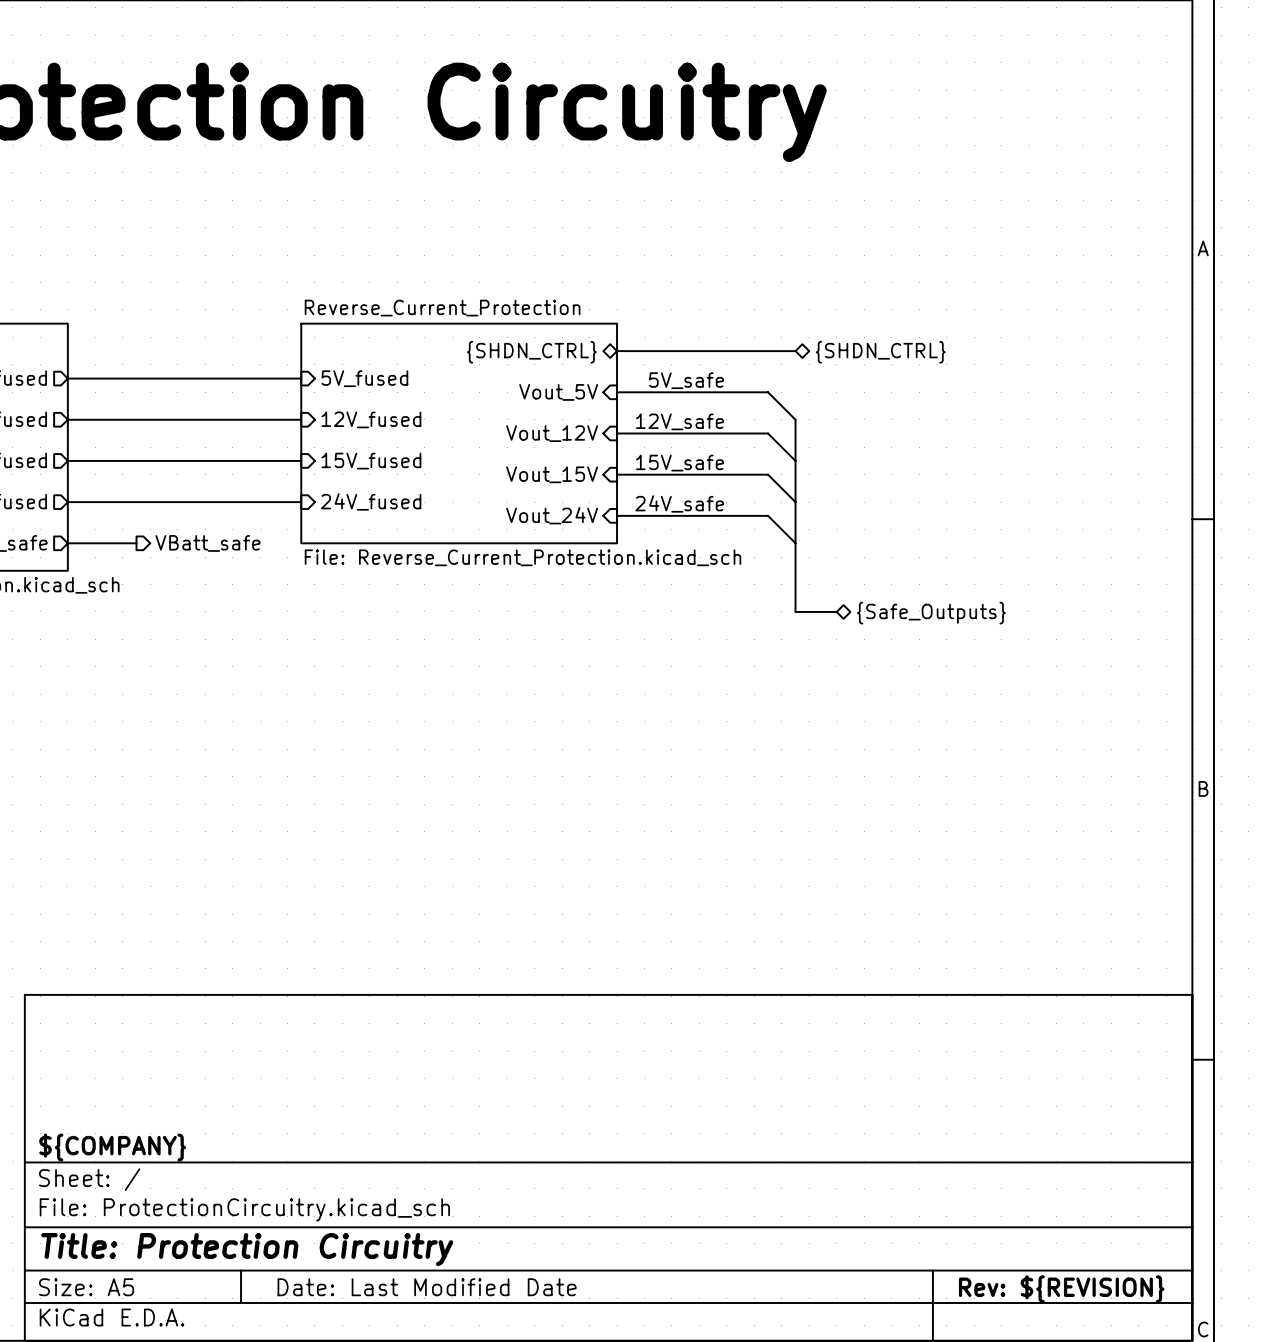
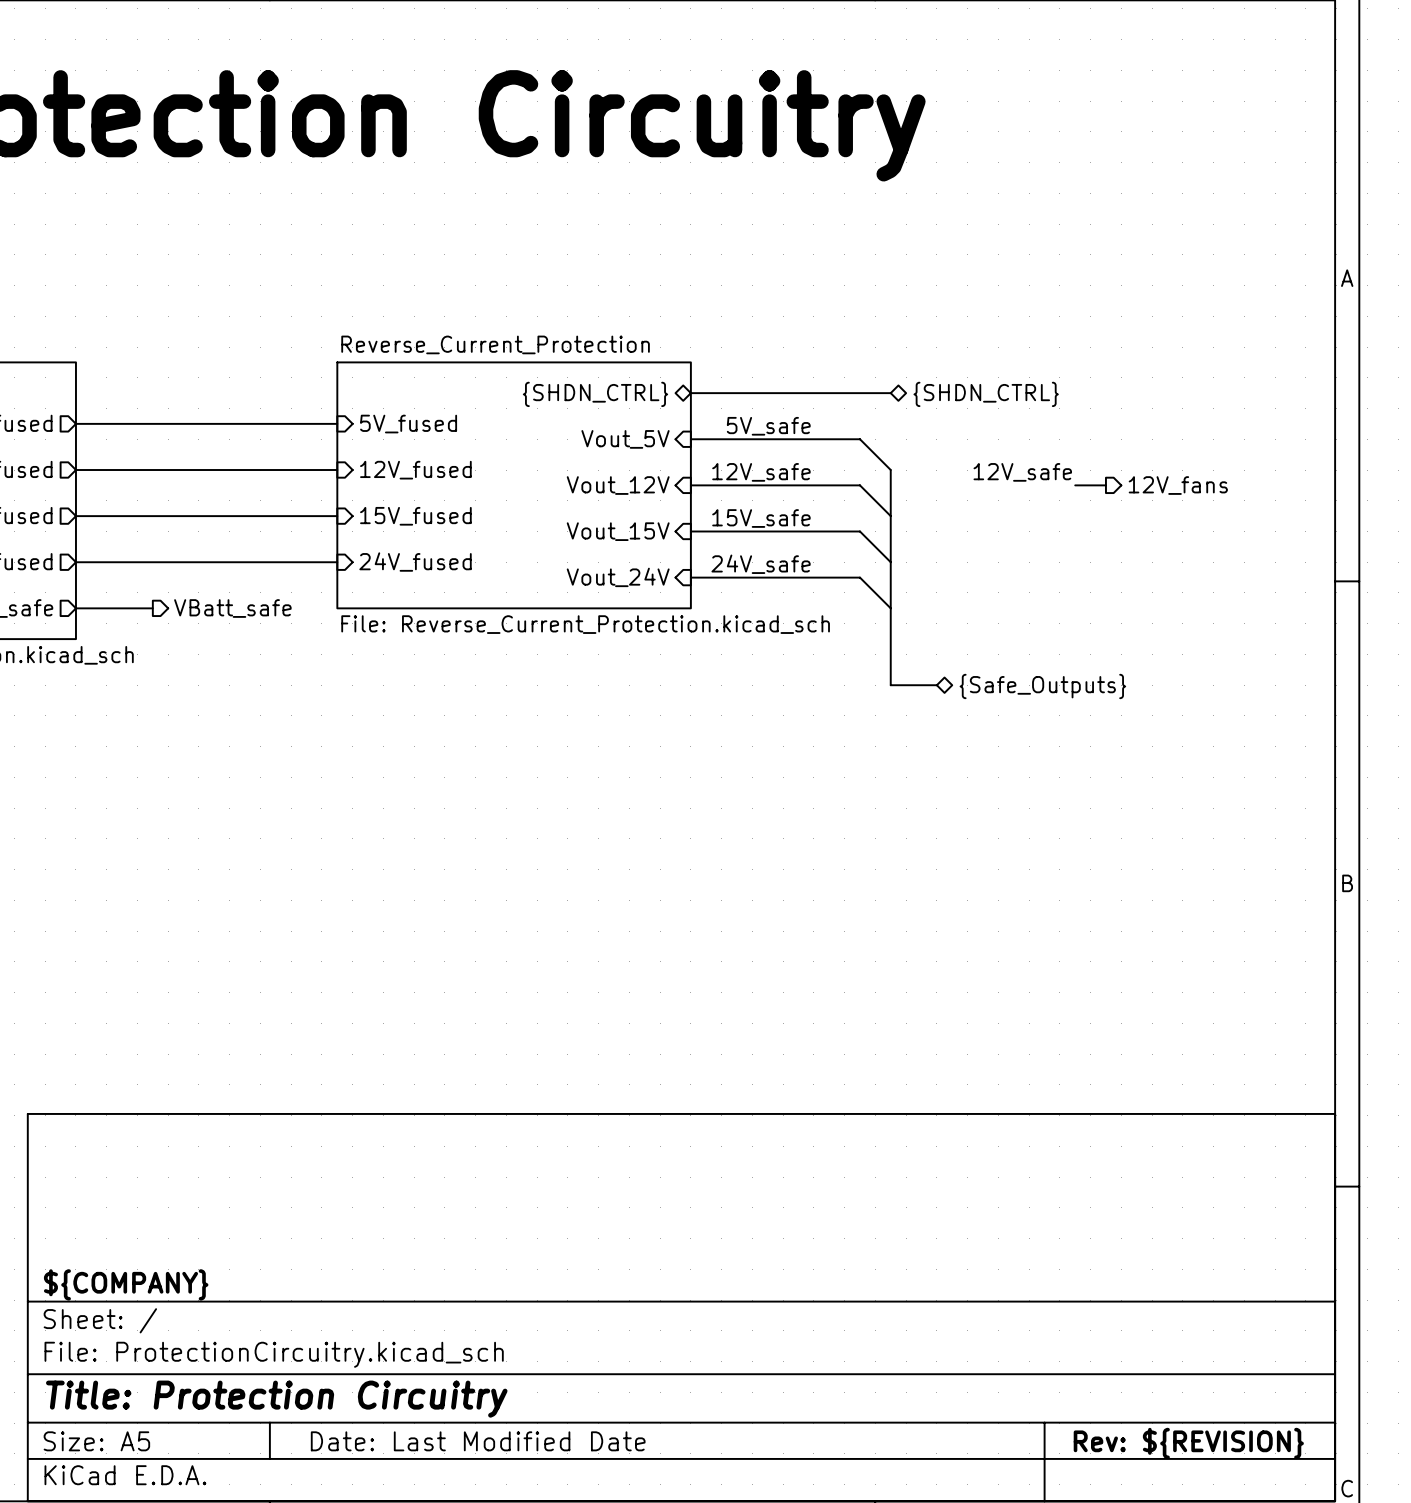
label: none -> 12V_safe (1022, 472)
wire: none -> (1075, 485) (1105, 485)
hierarchical label: none -> 12V_fans (1178, 485)

